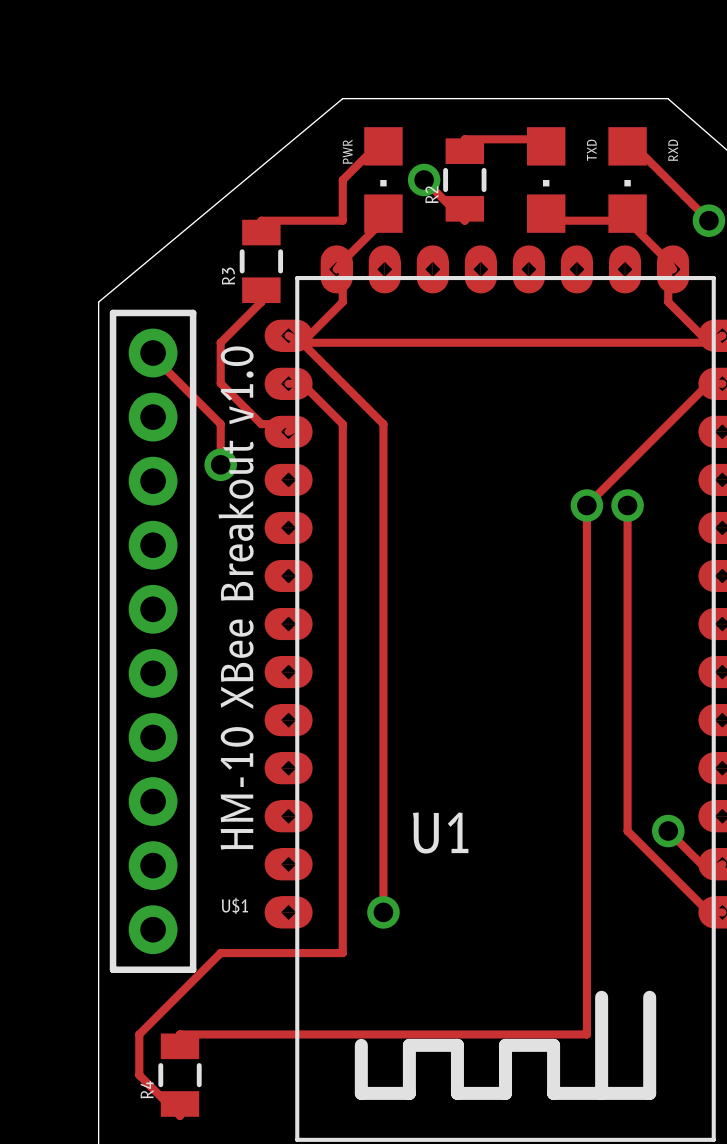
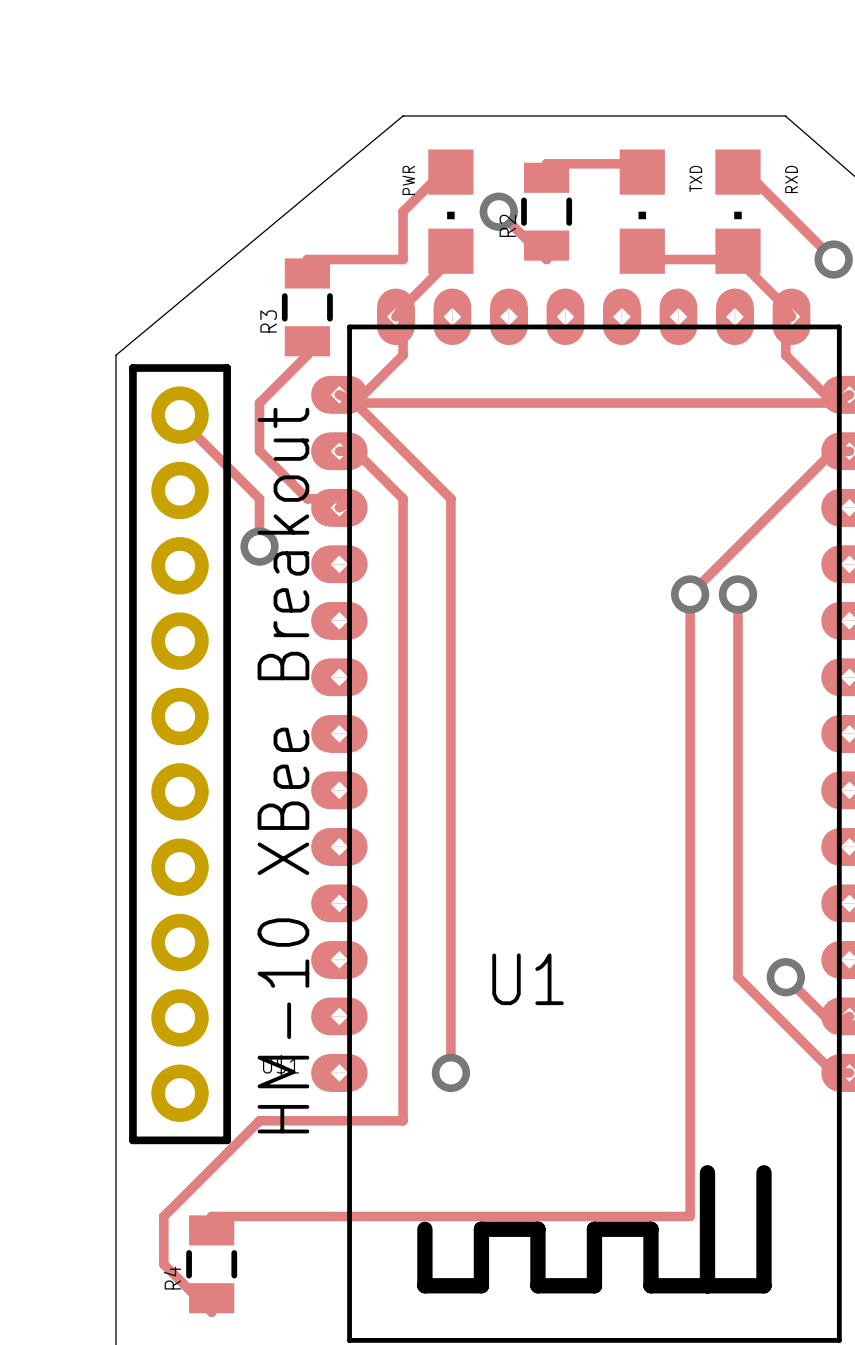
text: HM-10 XBee Breakout v1.0 (236, 598) -> HM-10 XBee Breakout (283, 770)

